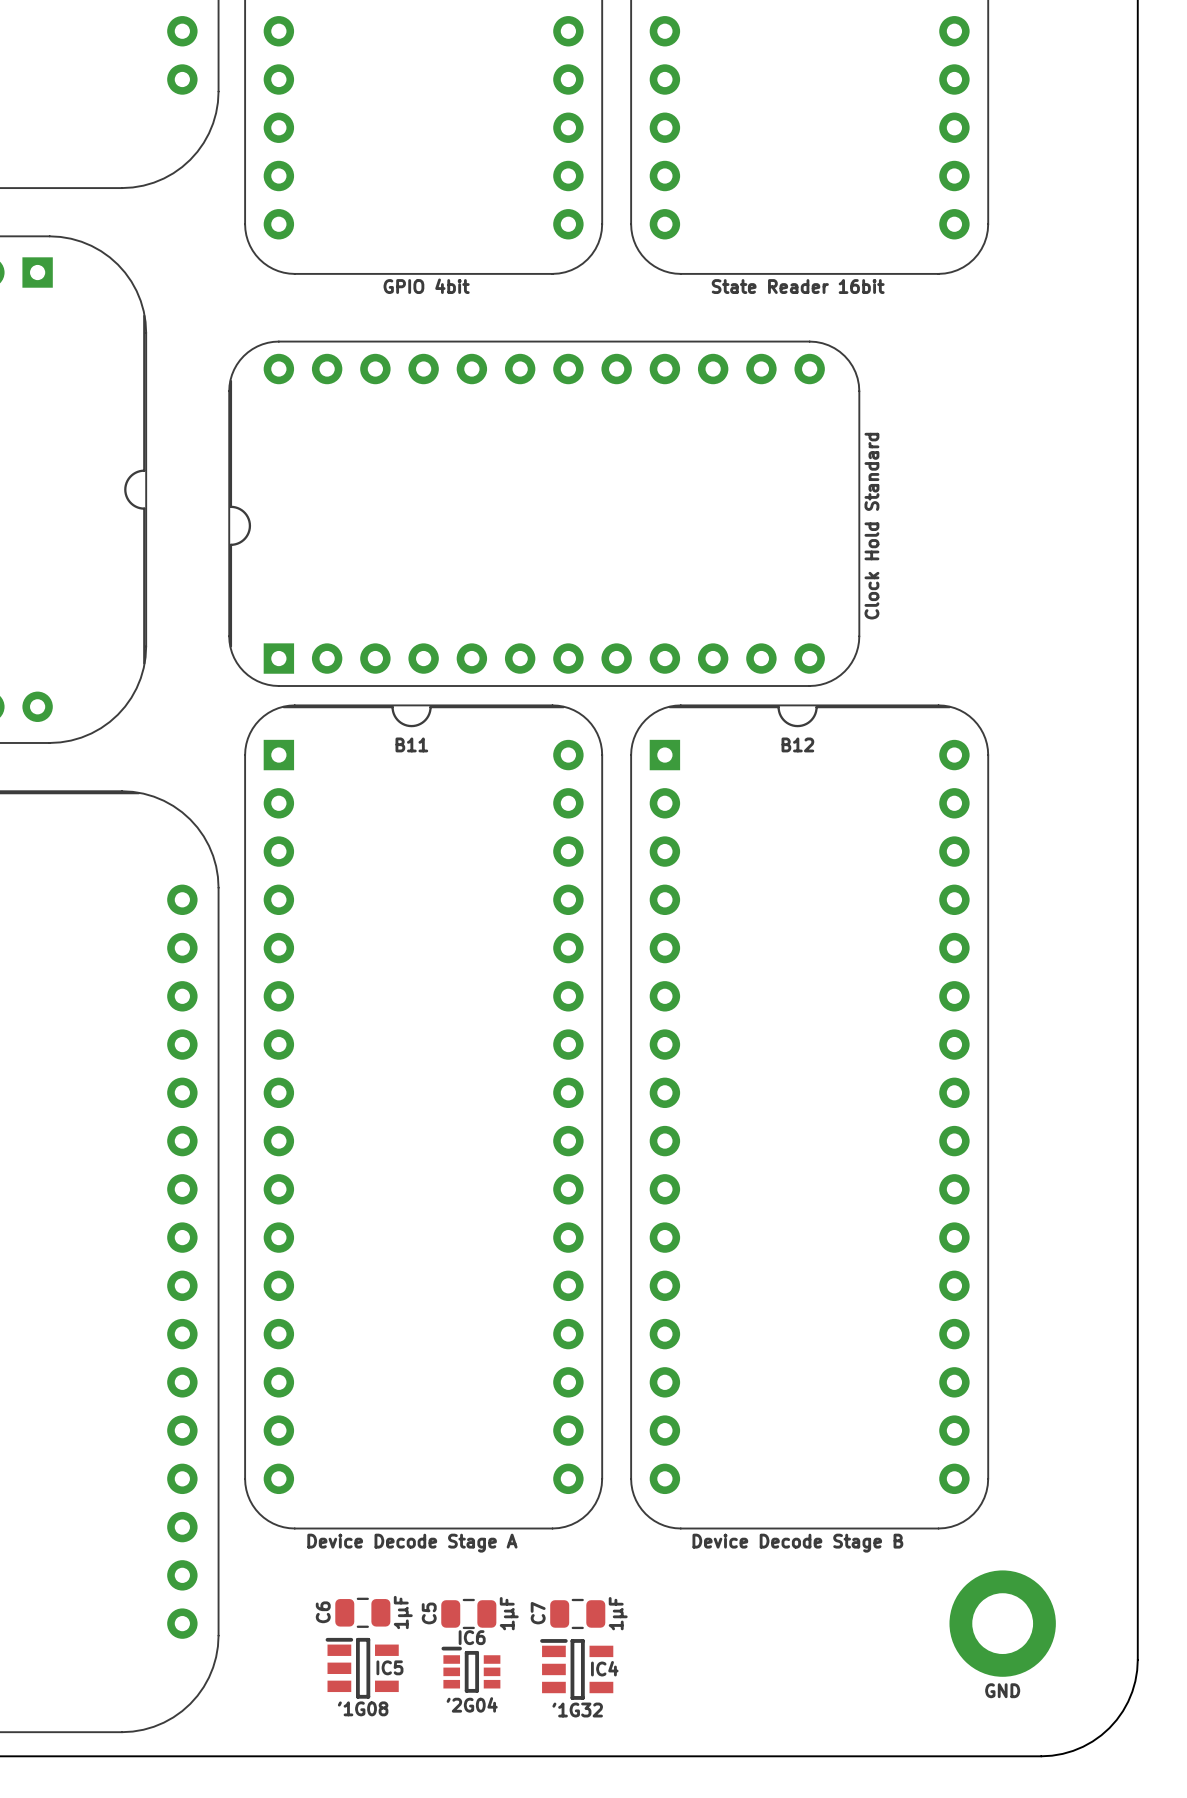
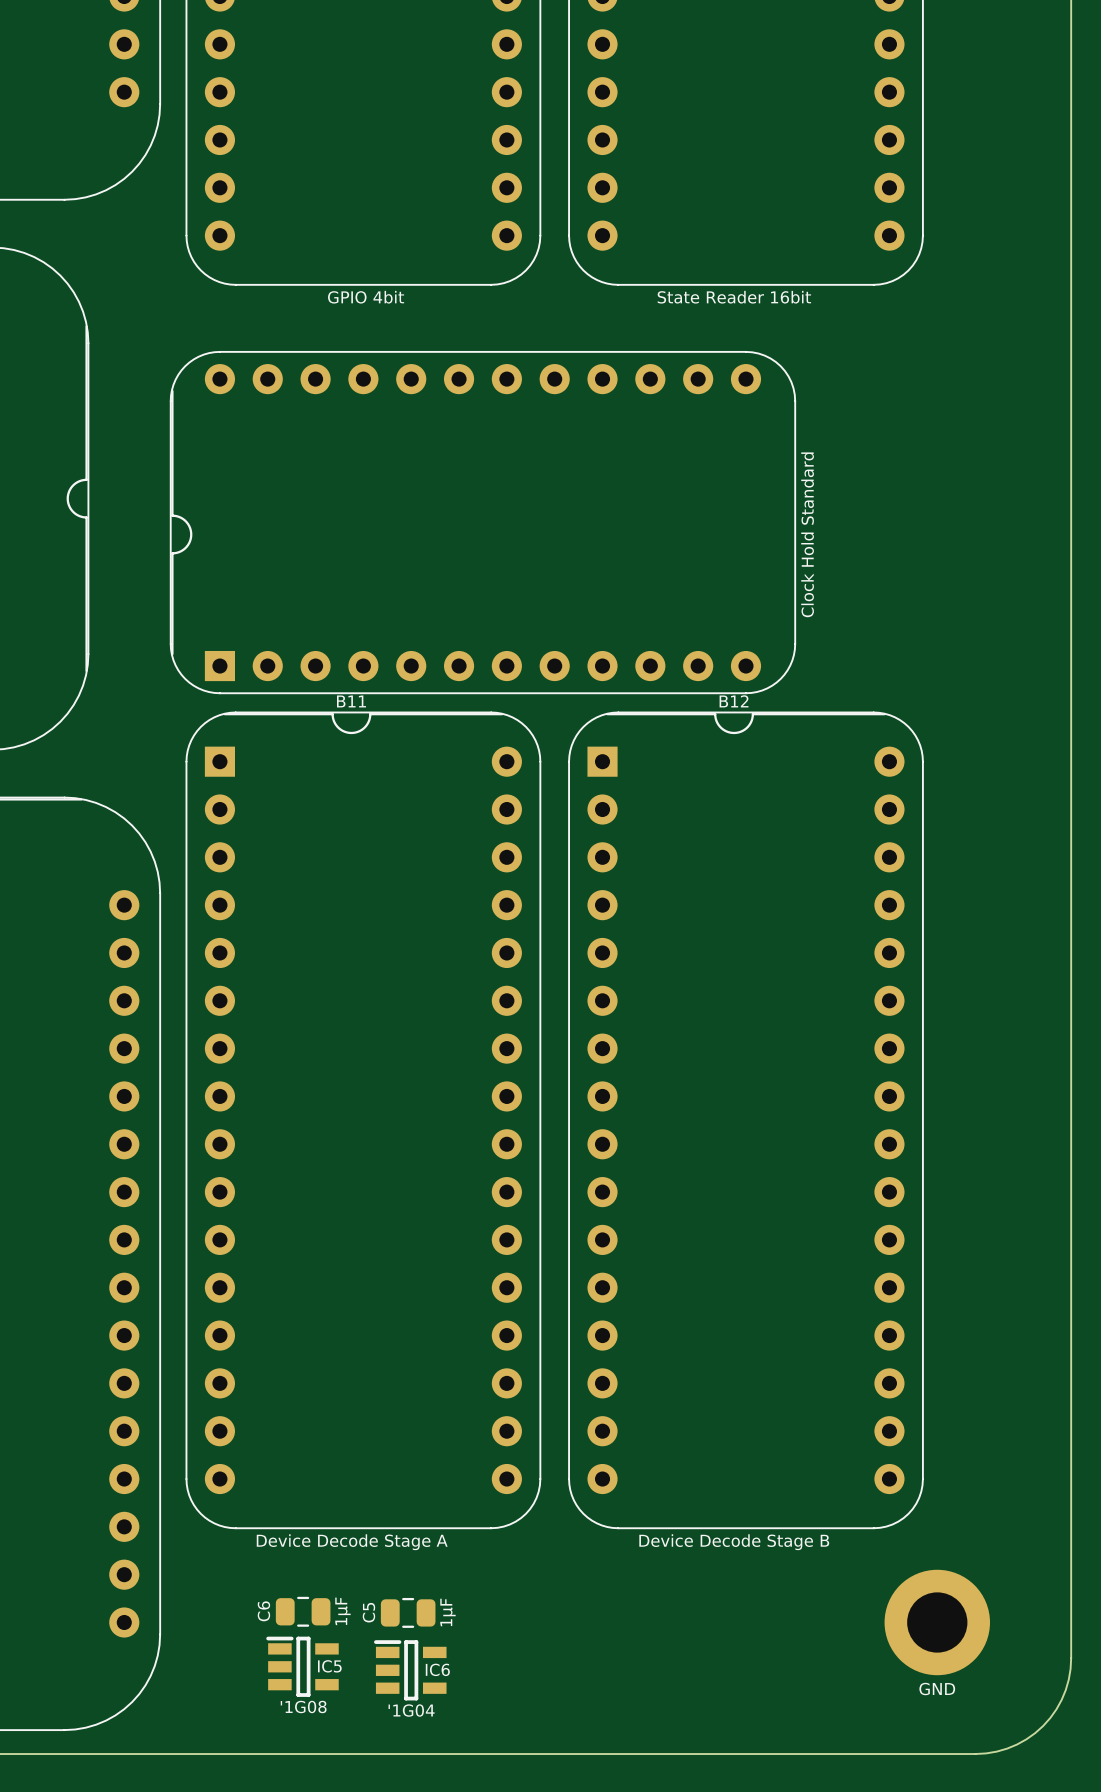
B11 name position: B11 (411, 744) -> B11 (351, 701)
B12 name position: B12 (797, 744) -> B12 (734, 701)
C7: 1µF (577, 1613) -> none
IC6 name position: IC6 (472, 1637) -> IC6 (437, 1669)
IC6 footprint: [441, 1646, 501, 1693] -> [374, 1640, 447, 1701]
IC4: (576, 1669) -> none

